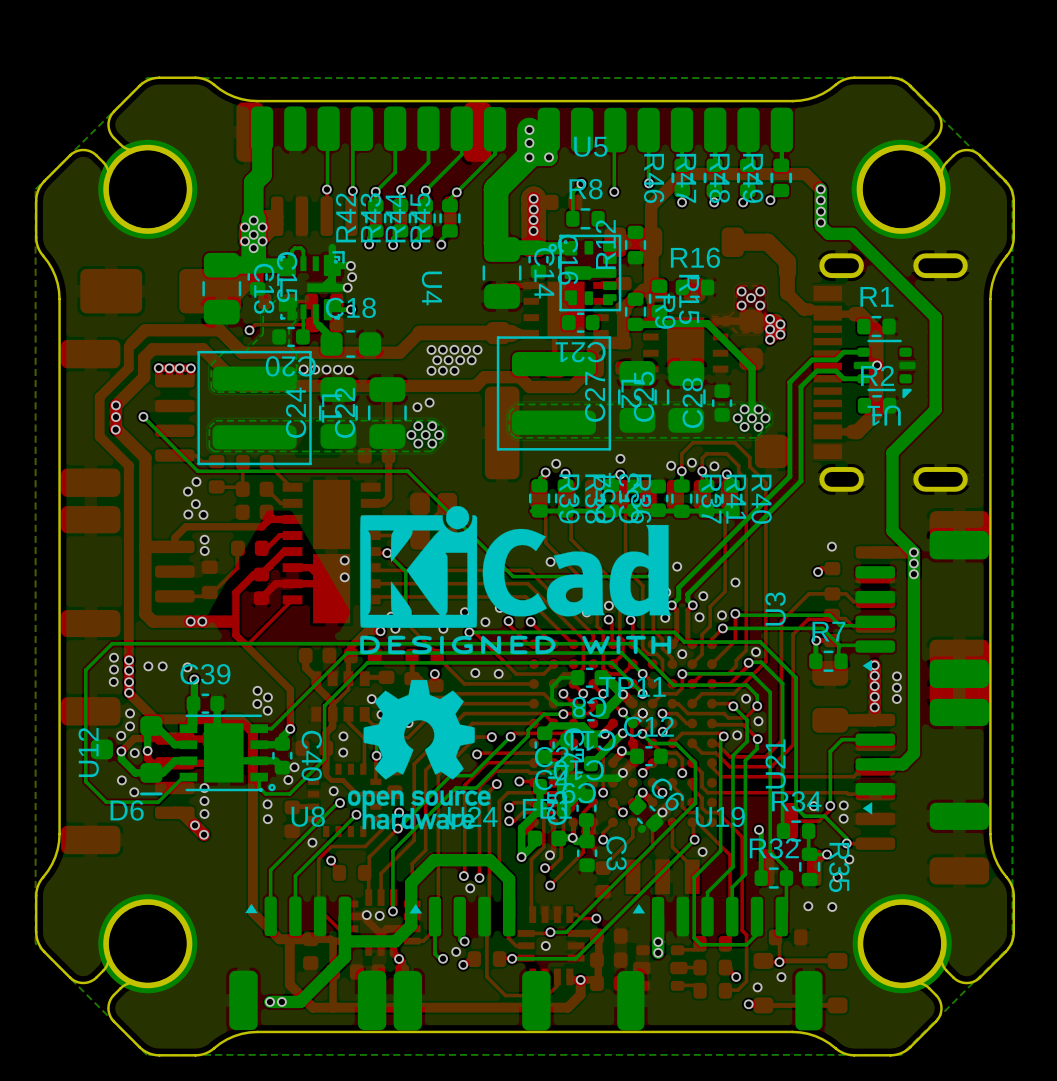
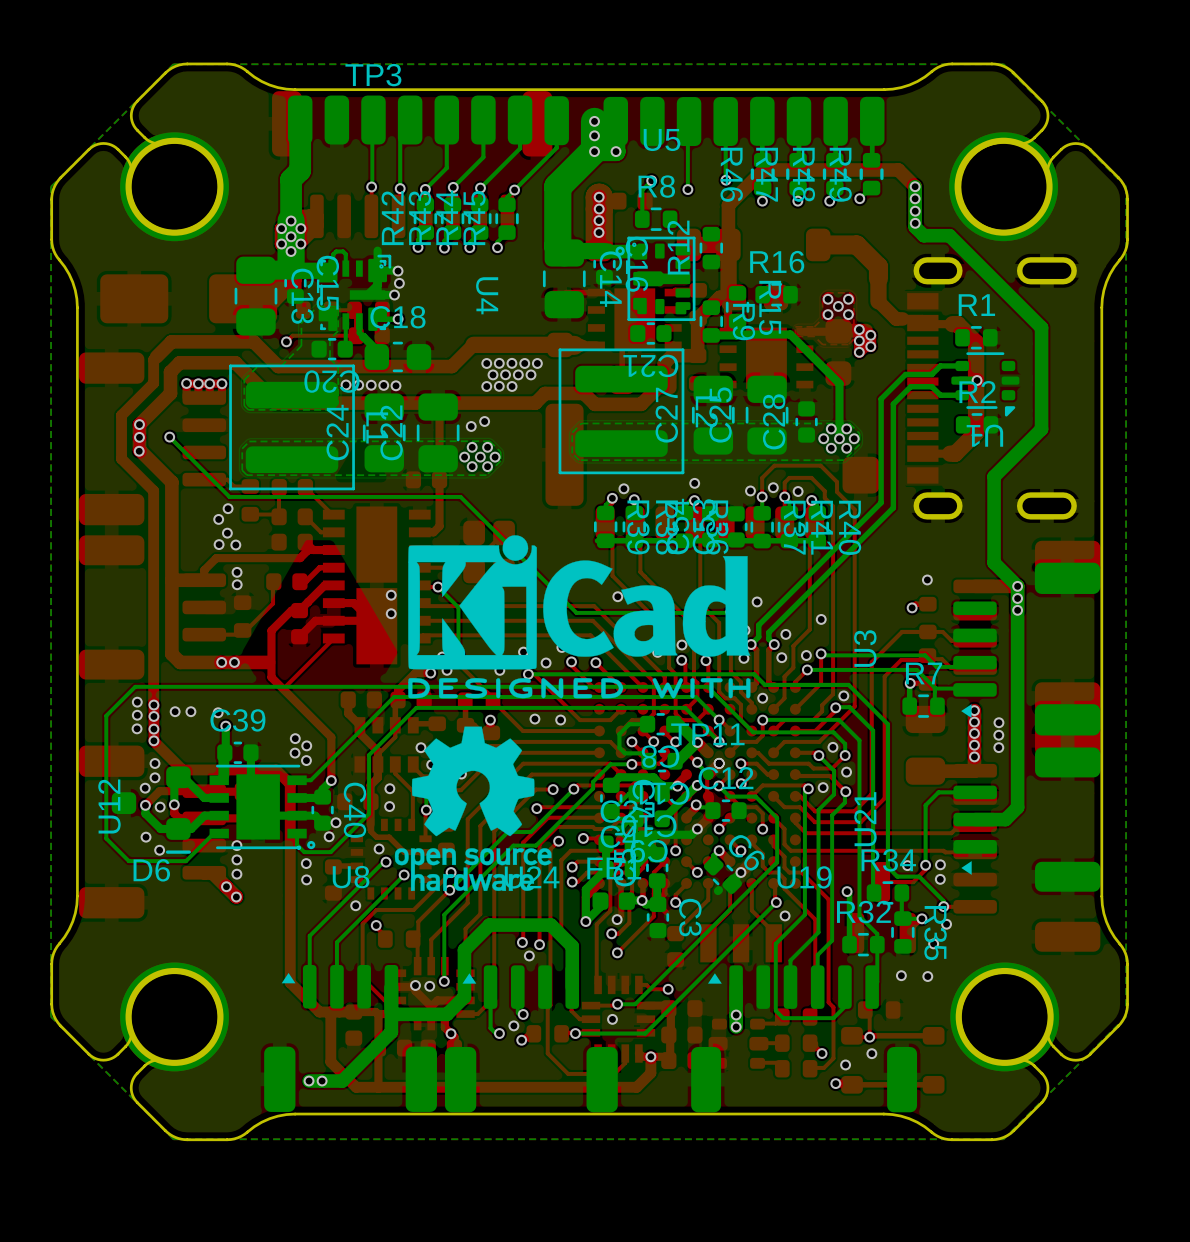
TP3 name: none -> TP3 (373, 75)

